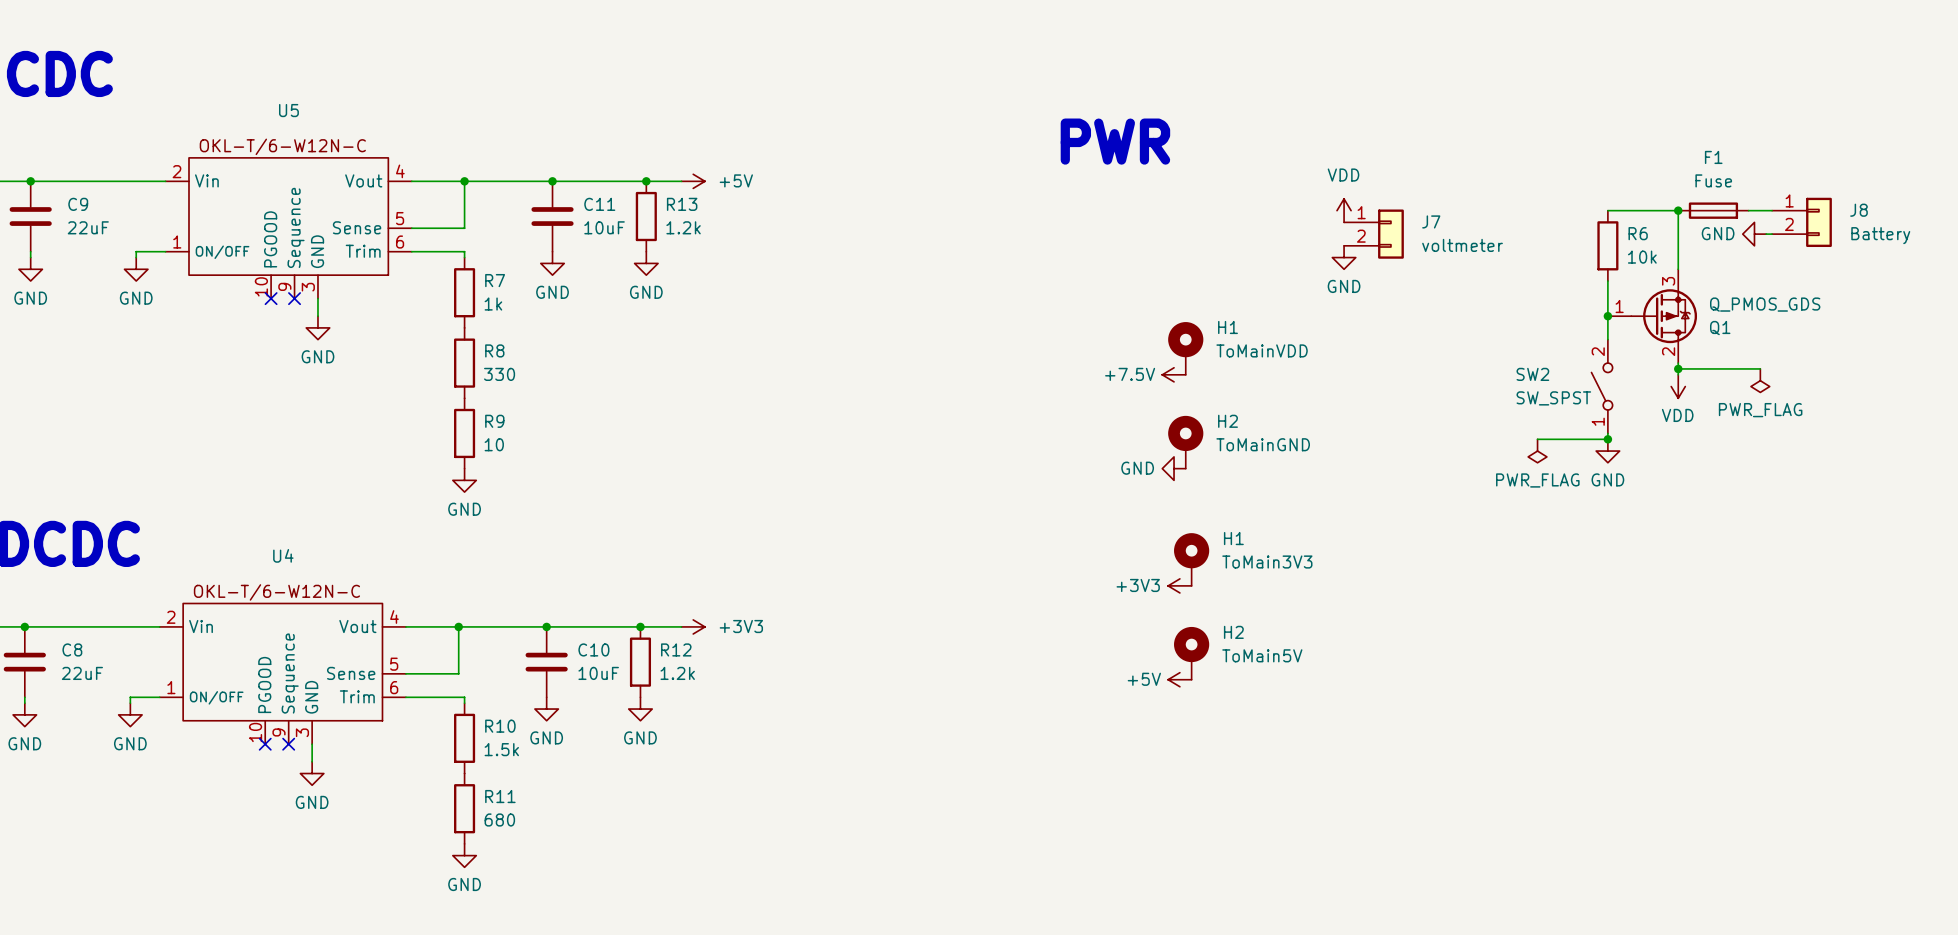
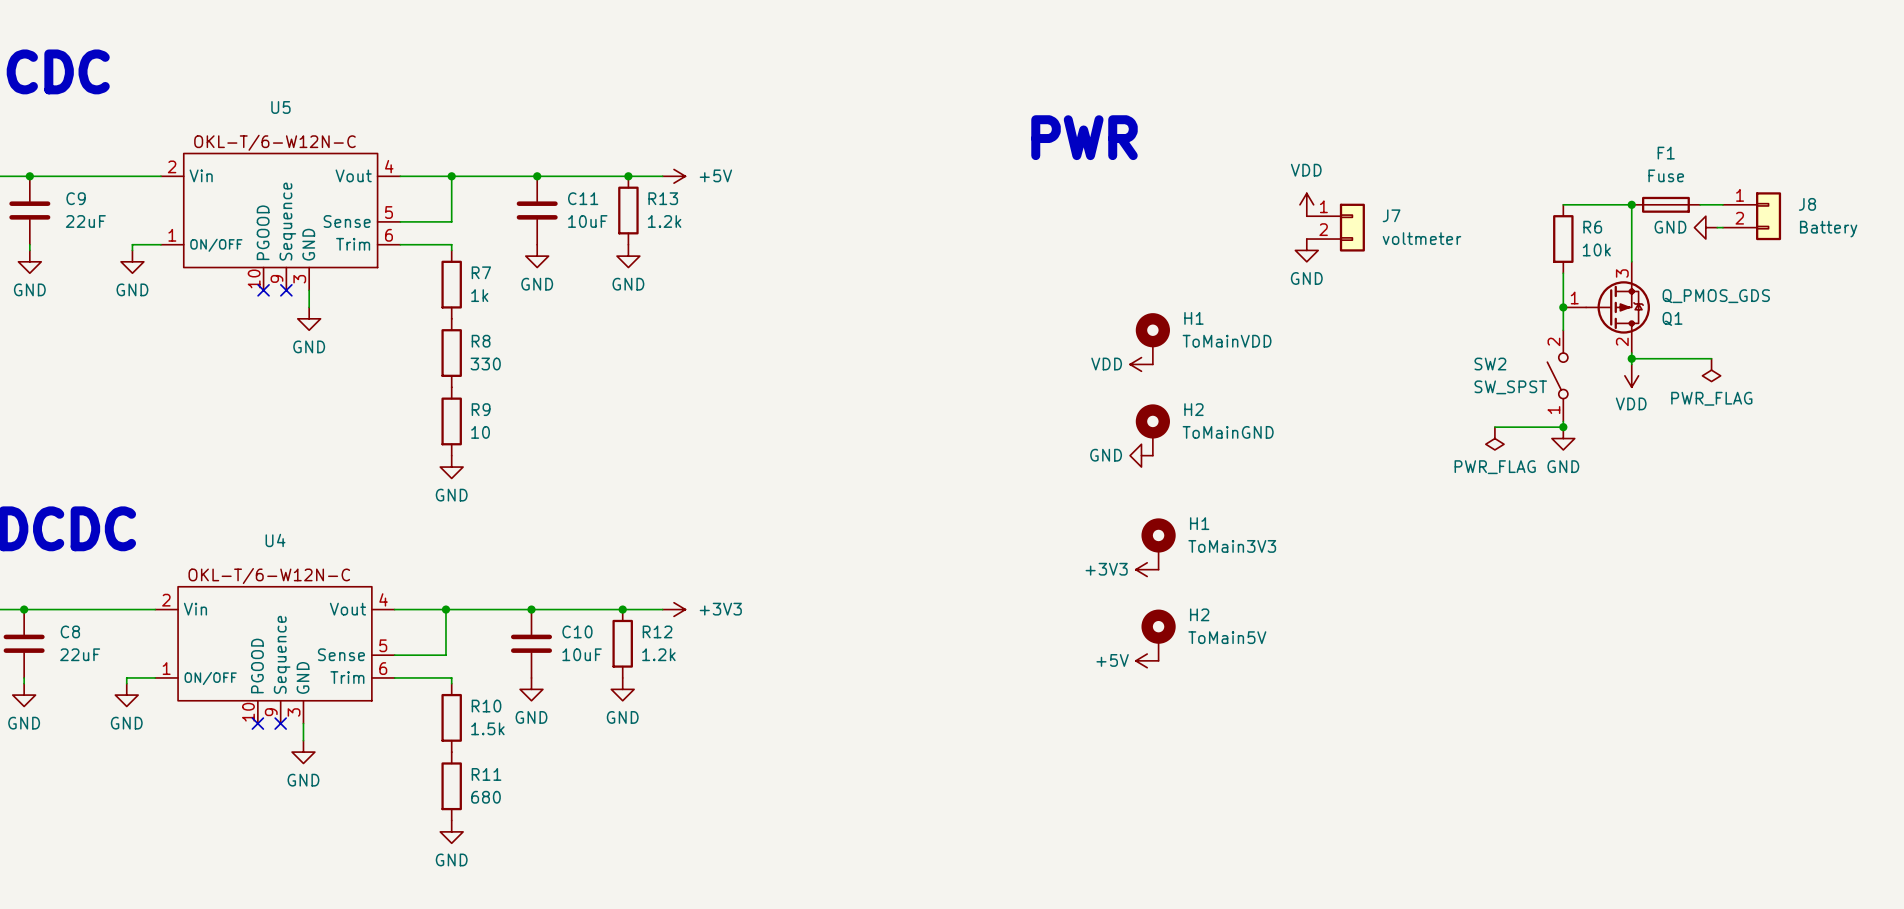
power symbol: +7.5V (1174, 374) -> VDD (1141, 364)

